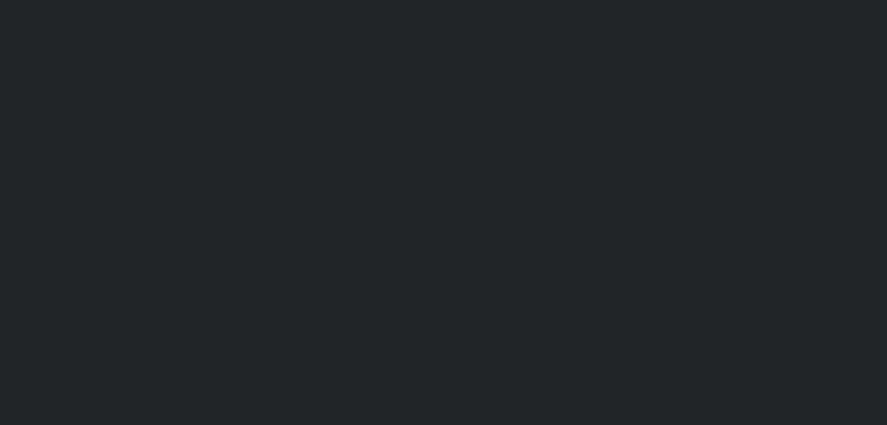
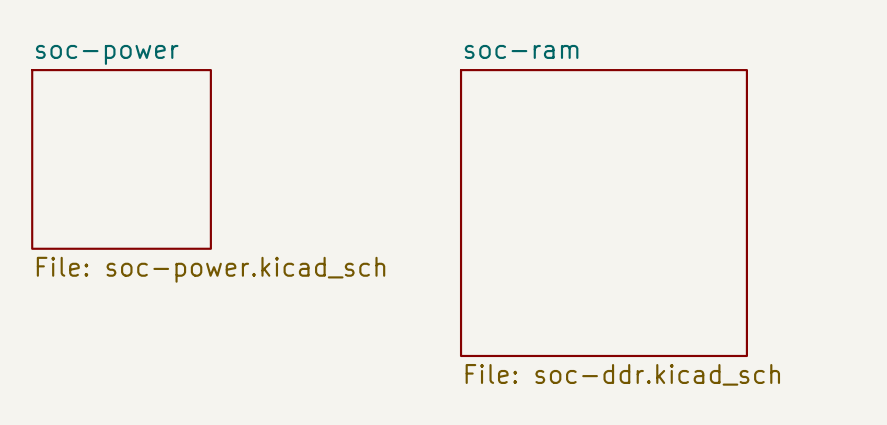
sheet soc-power: none -> File: soc-power.kicad_sch (121, 159)
sheet soc-ram: none -> File: soc-ddr.kicad_sch (603, 213)

